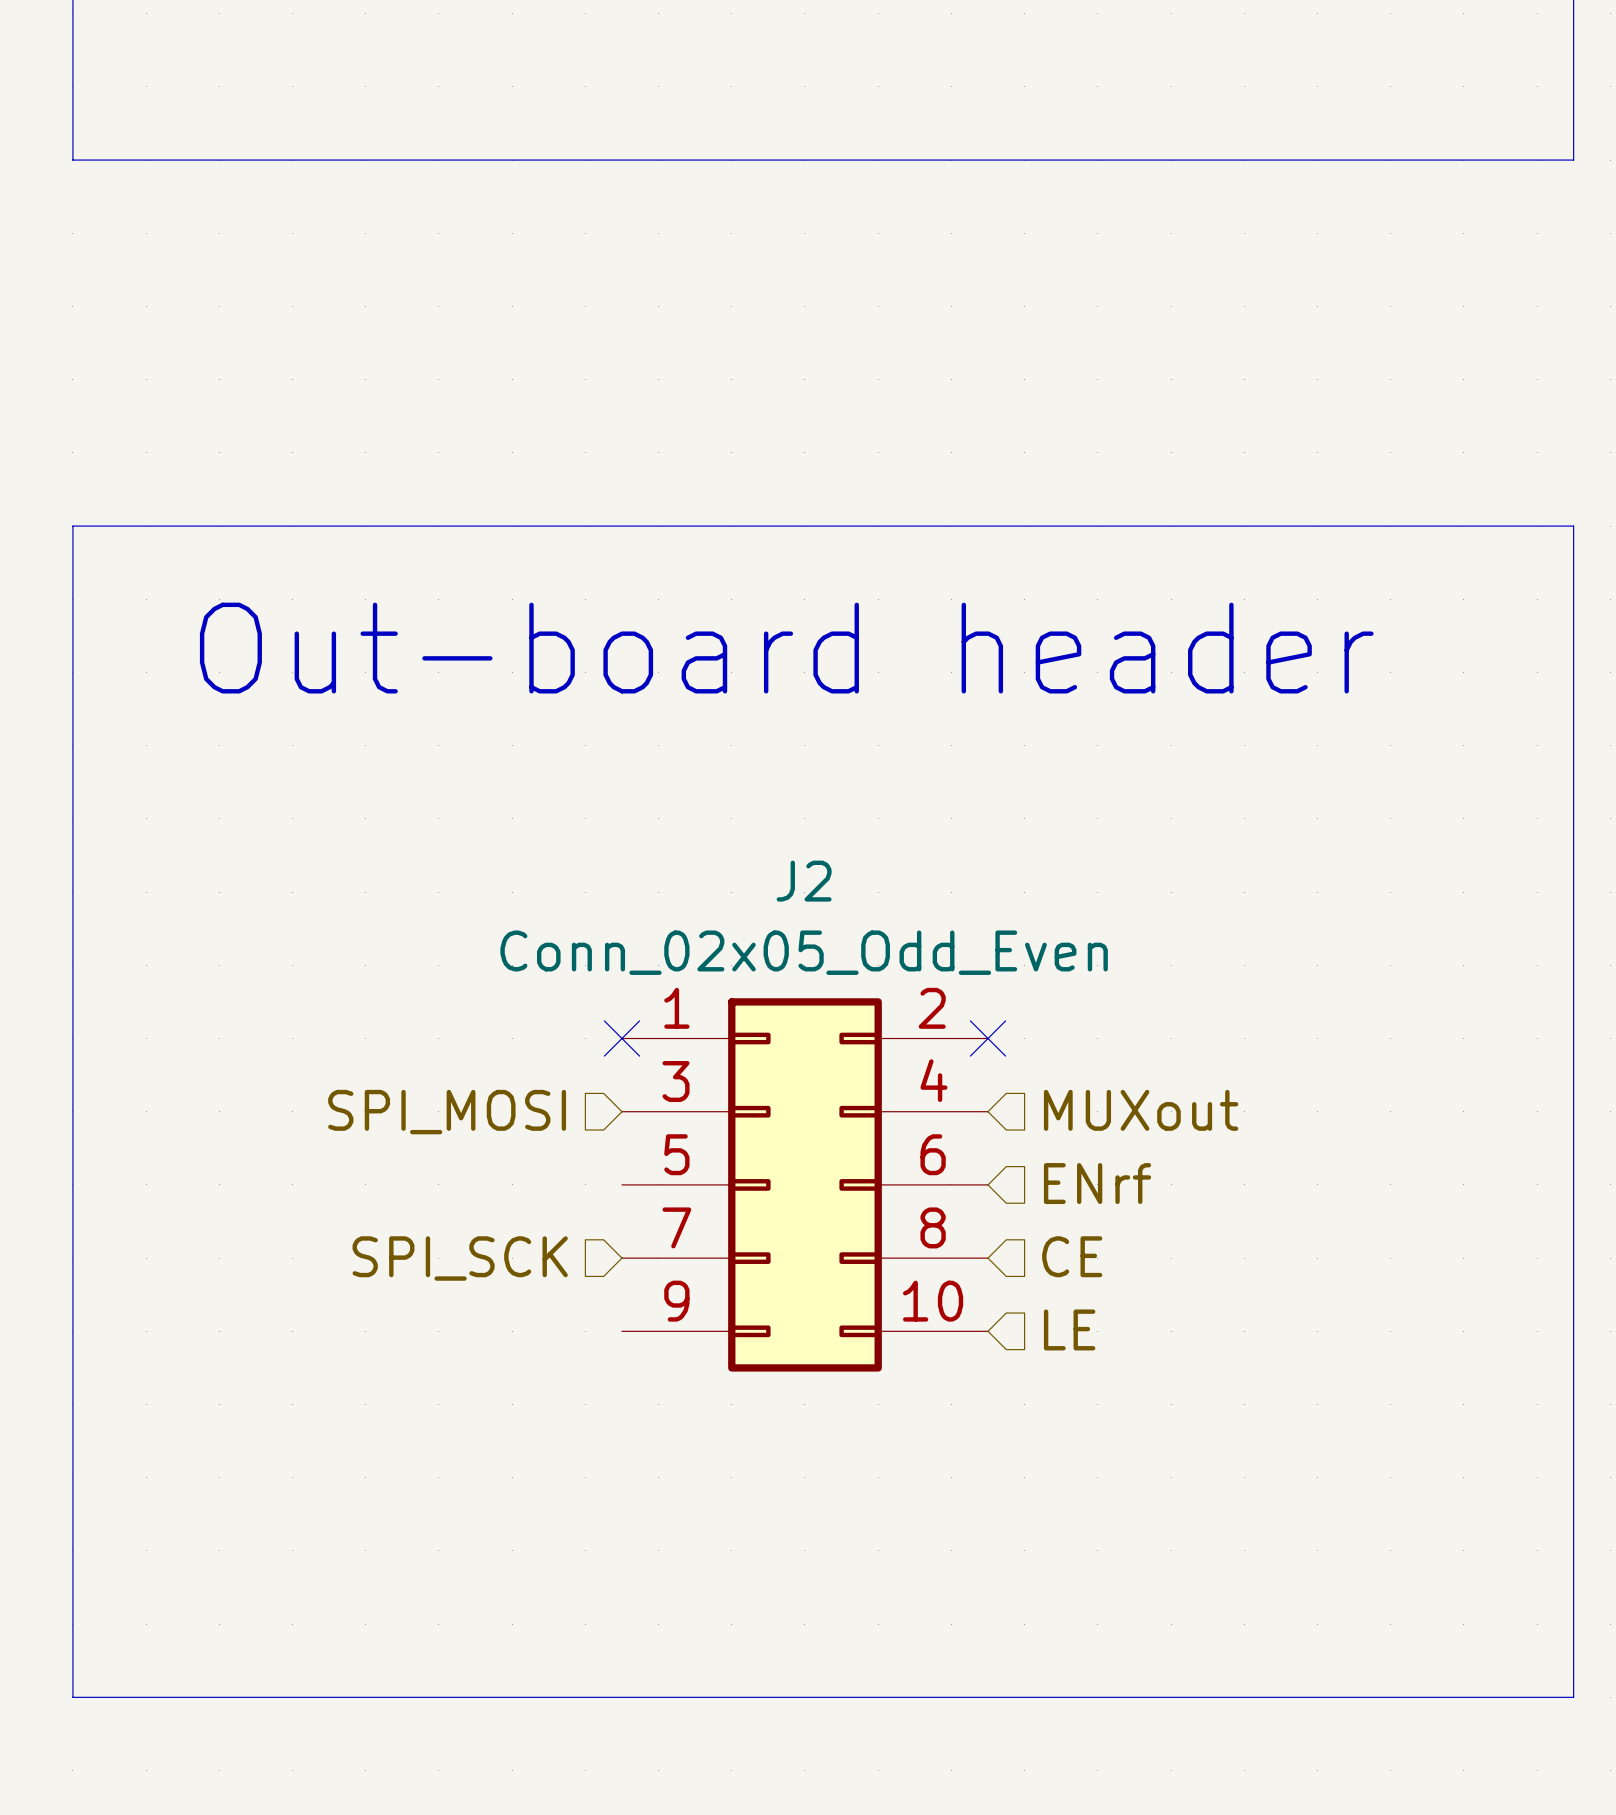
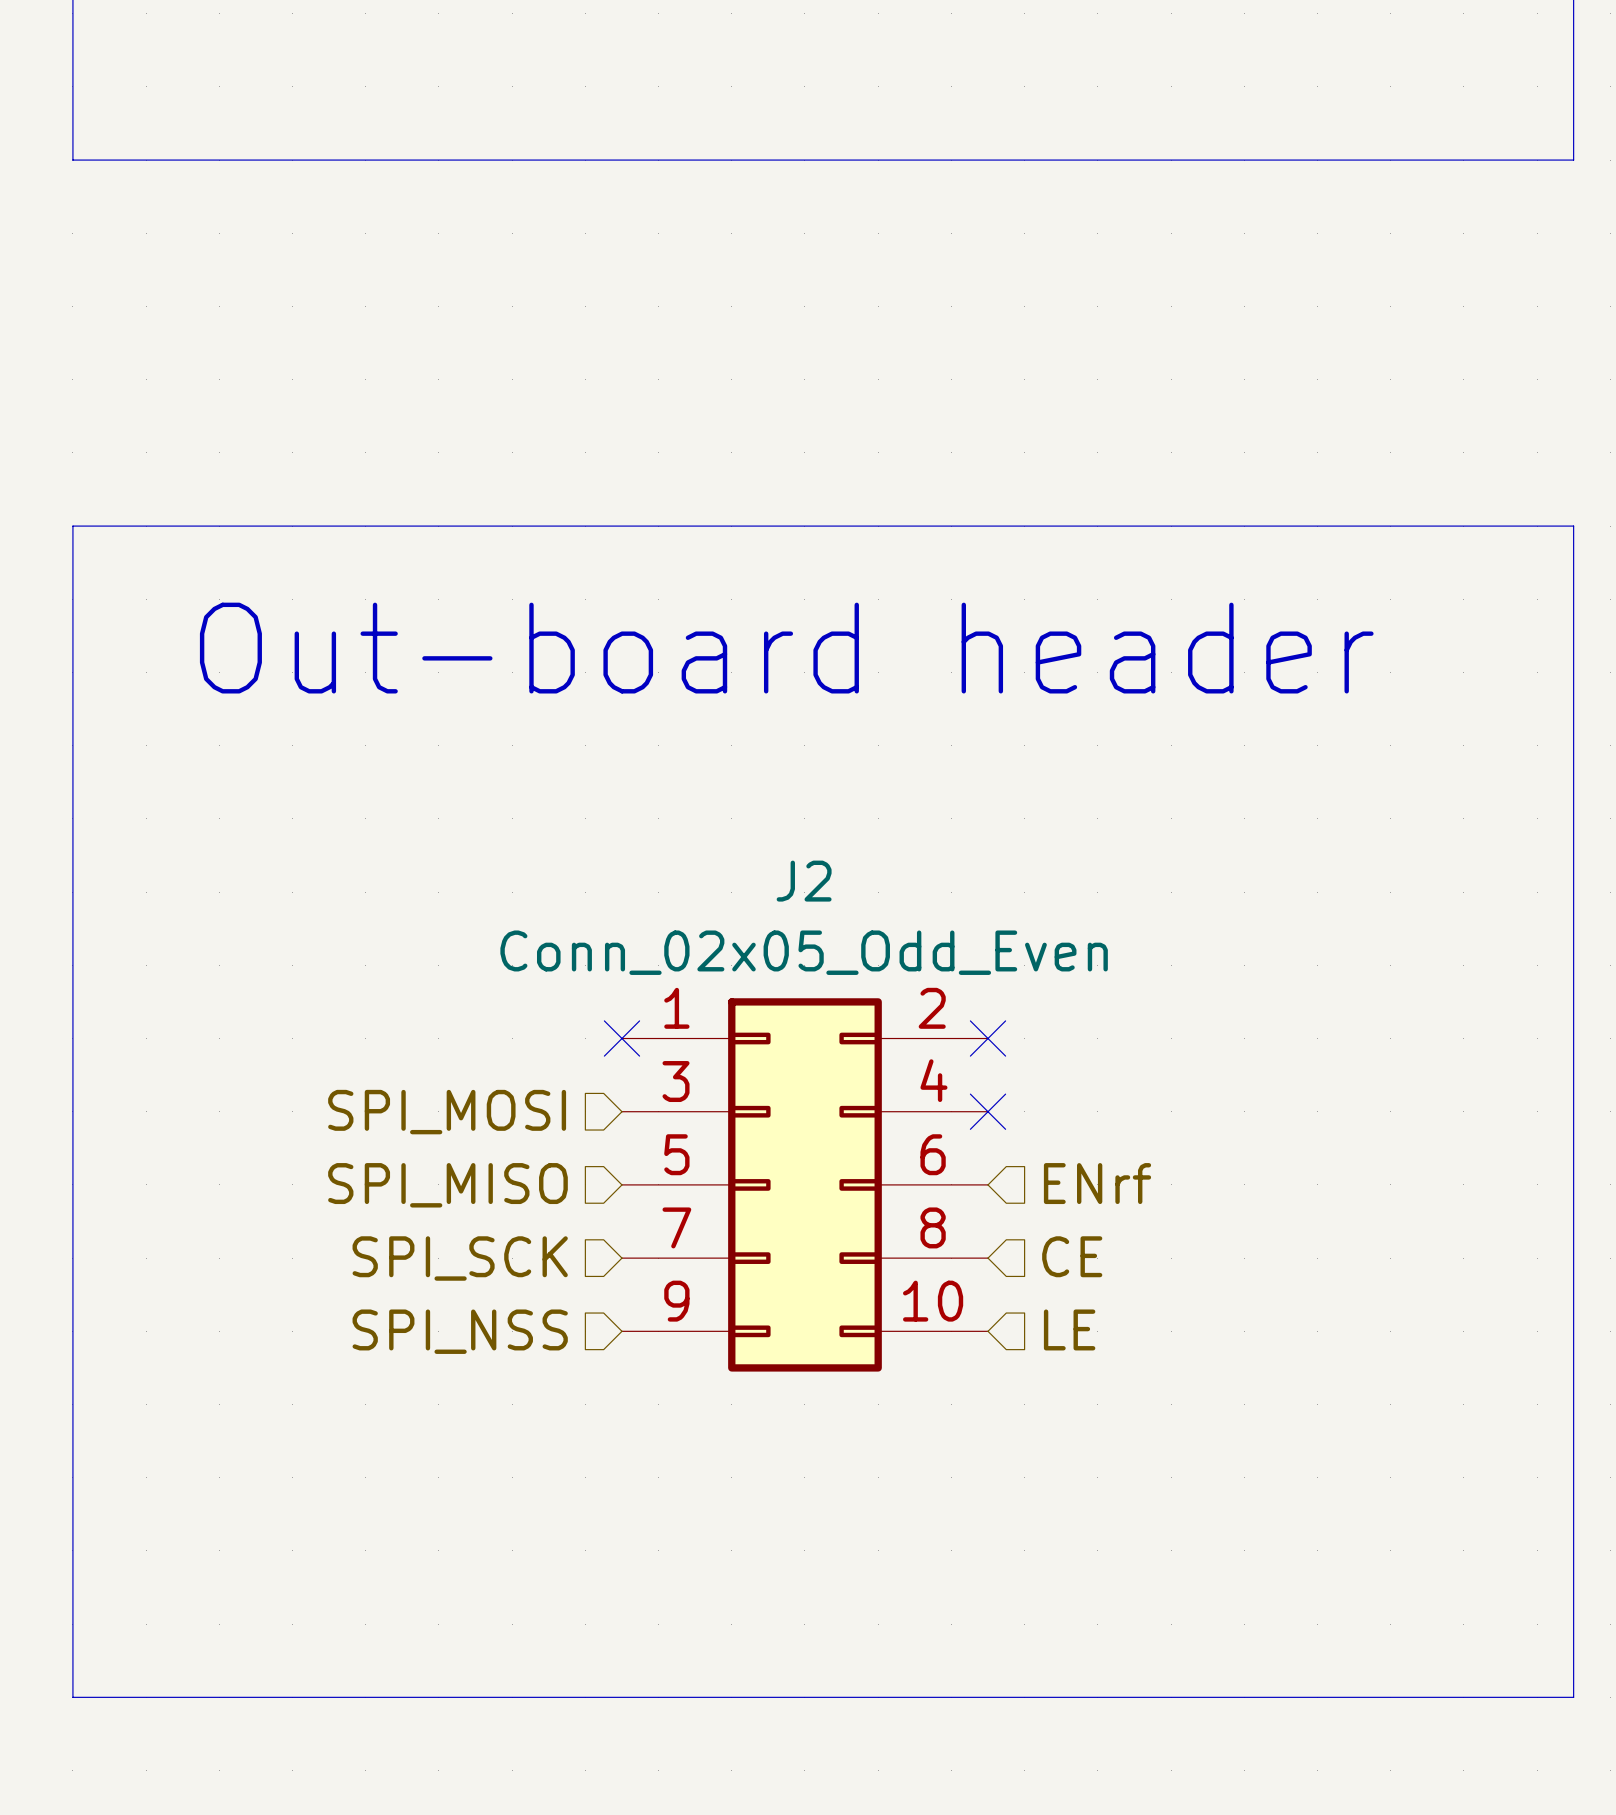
hierarchical label: MUXout (1141, 1110) -> none
no-connect mark: none -> (988, 1111)
hierarchical label: none -> SPI_MISO (447, 1185)
hierarchical label: none -> SPI_NSS (460, 1331)

